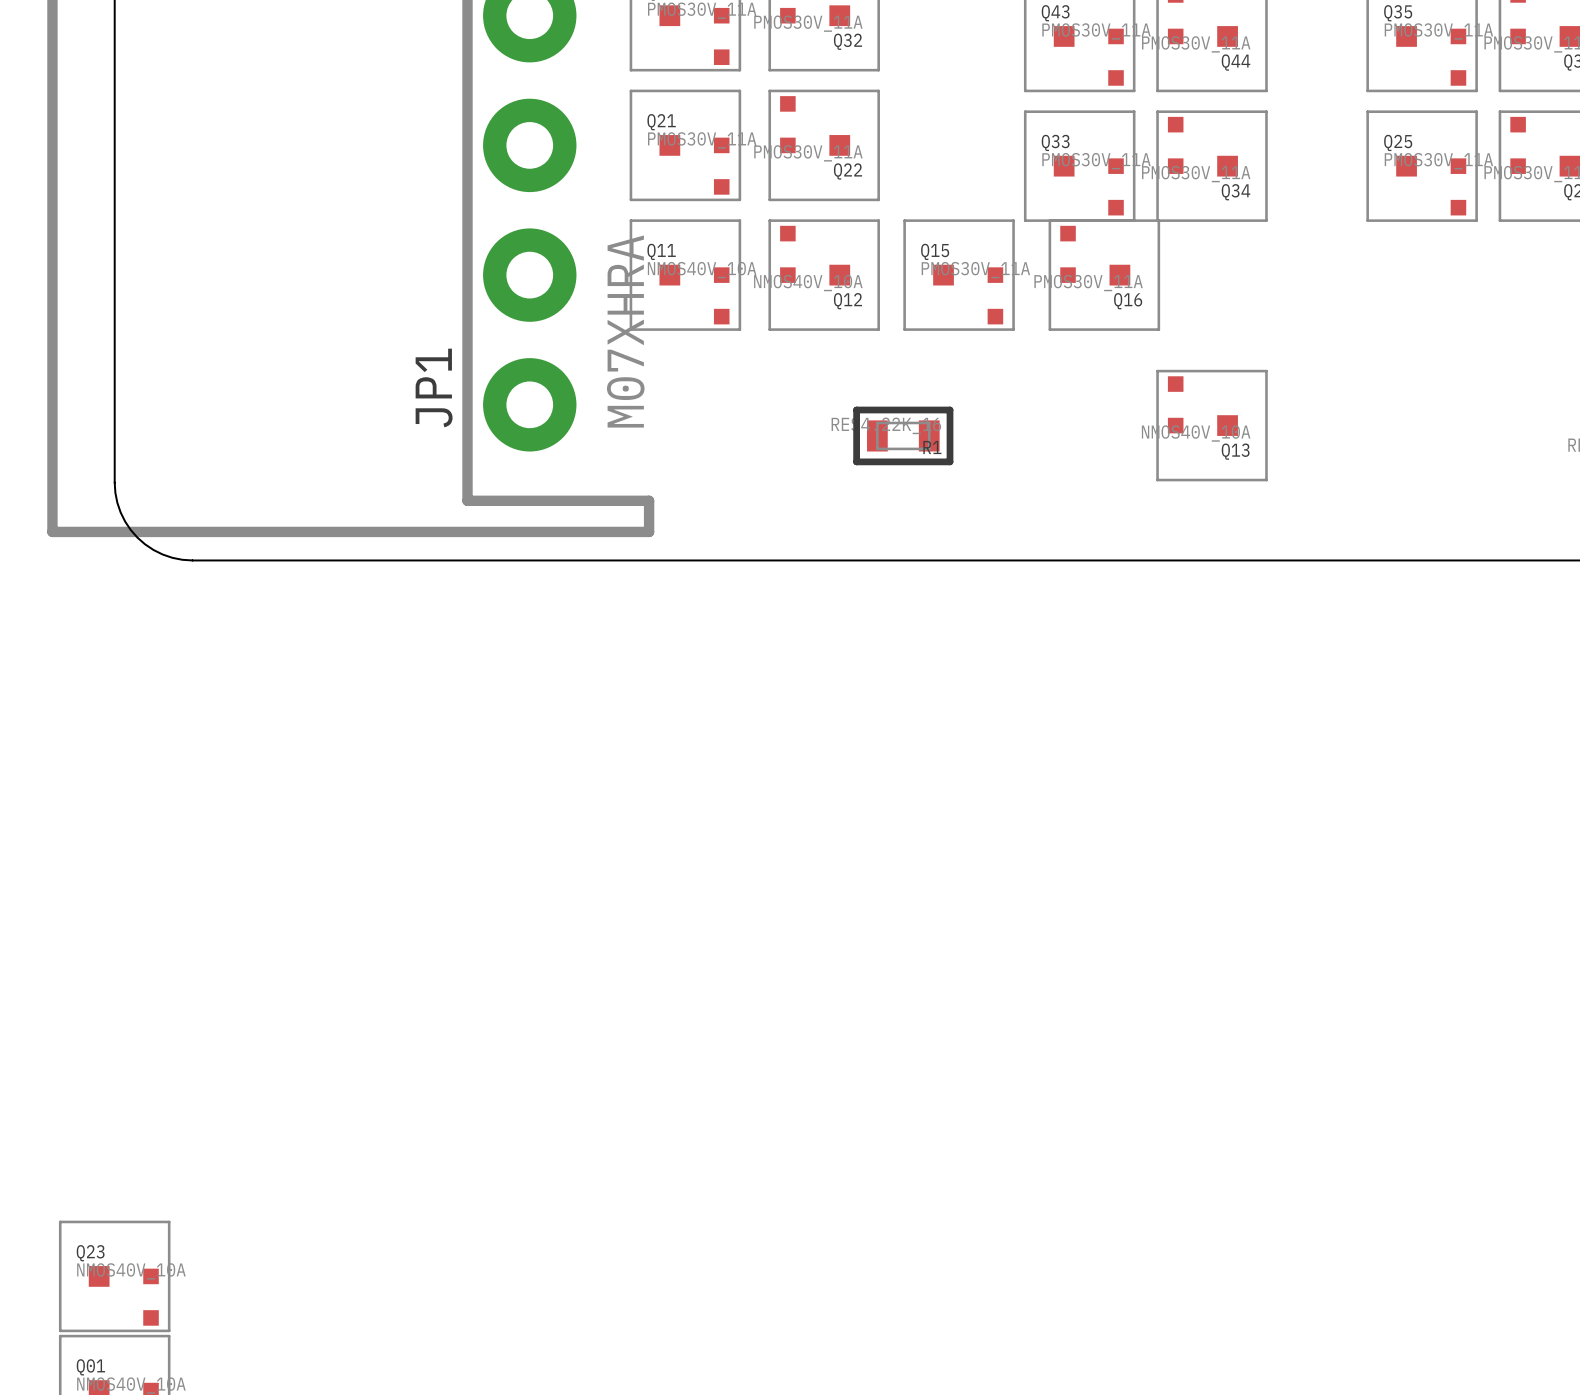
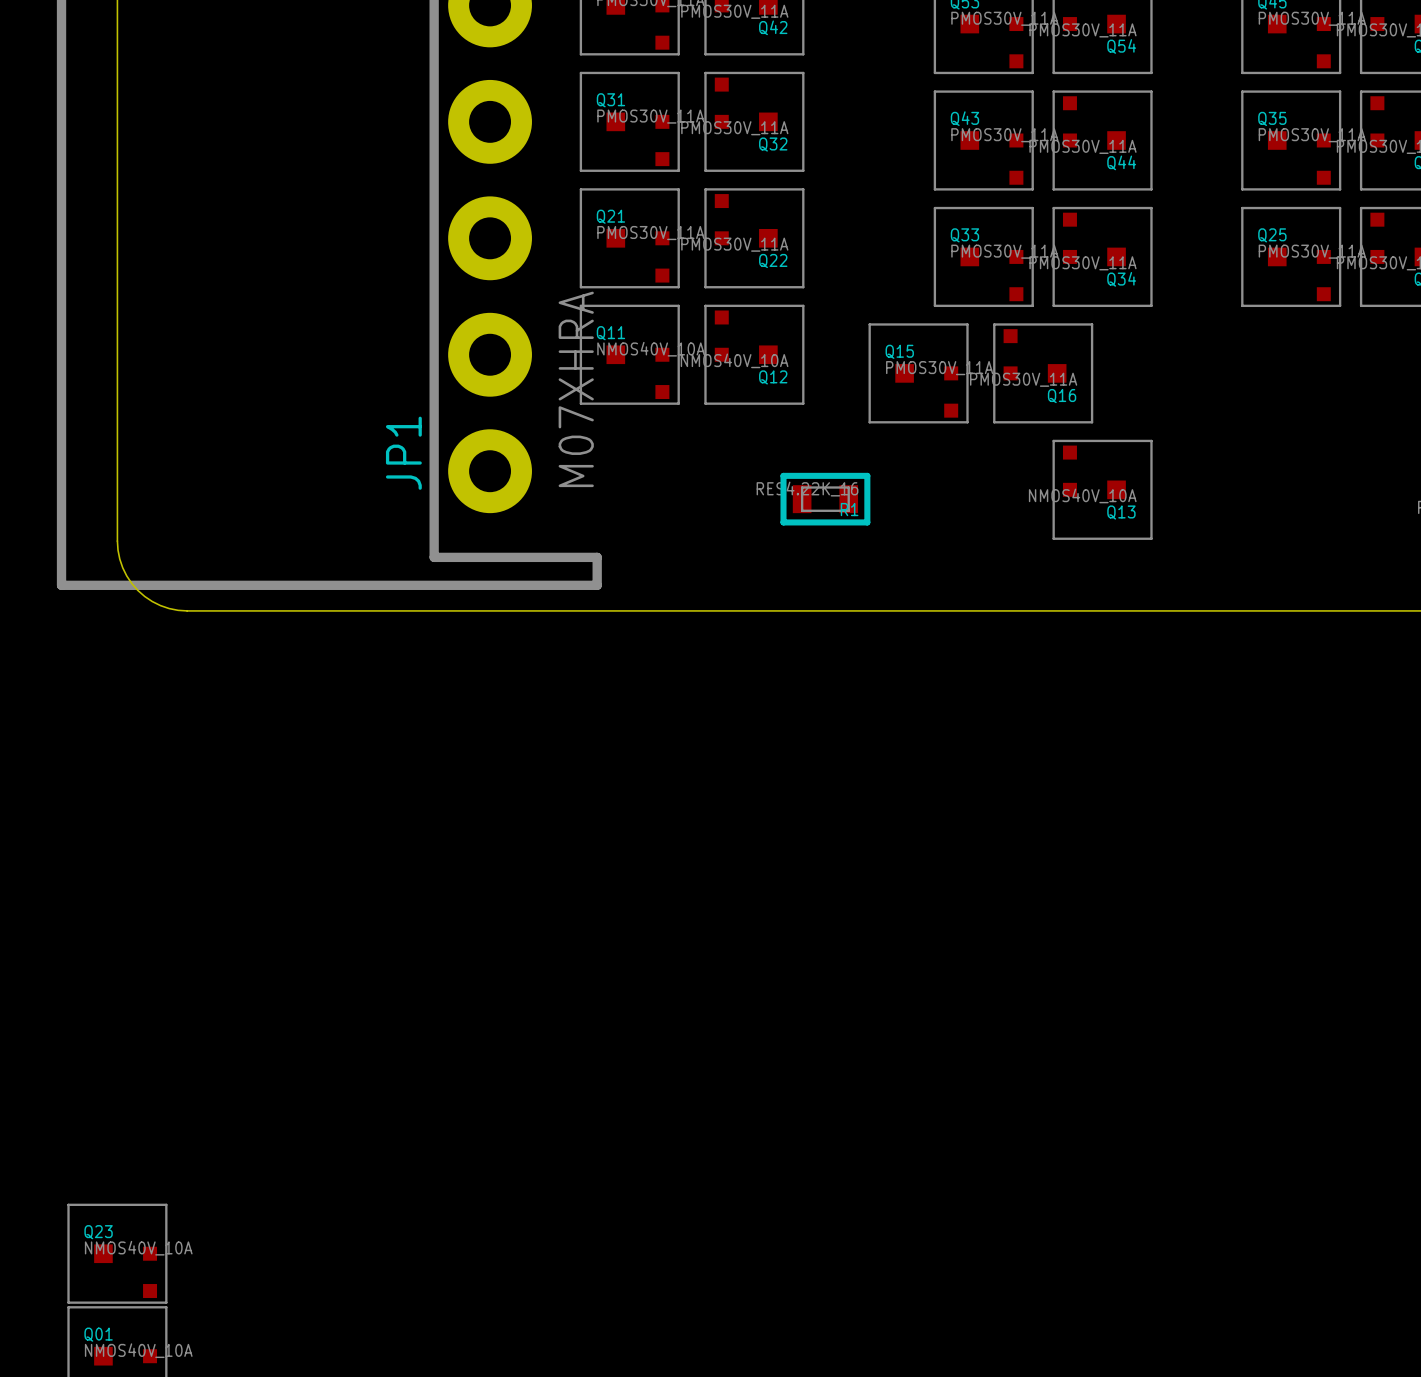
Q15 position: (959, 275) -> (918, 373)
Q16 position: (1104, 275) -> (1043, 373)

